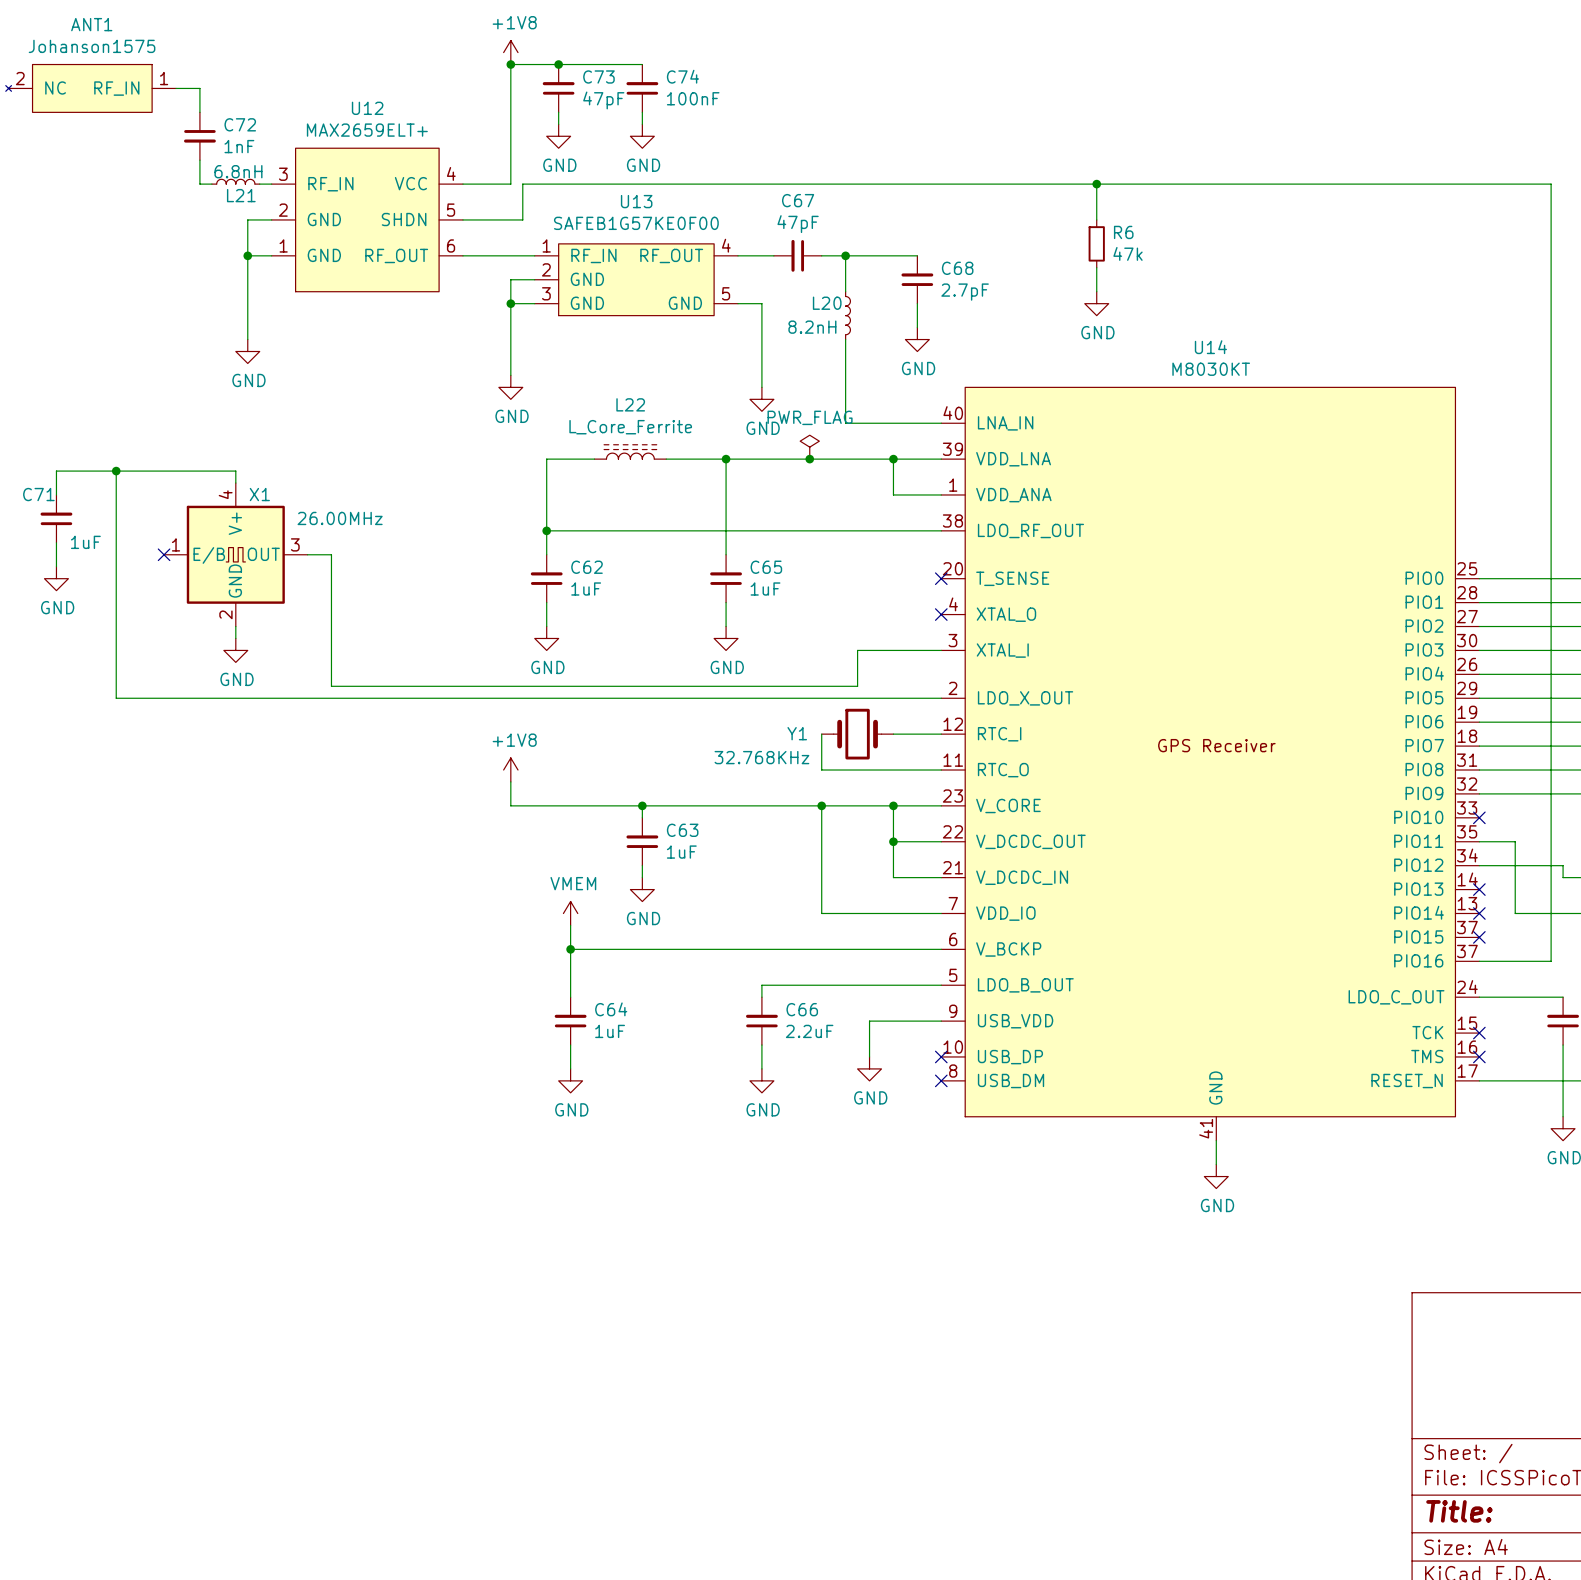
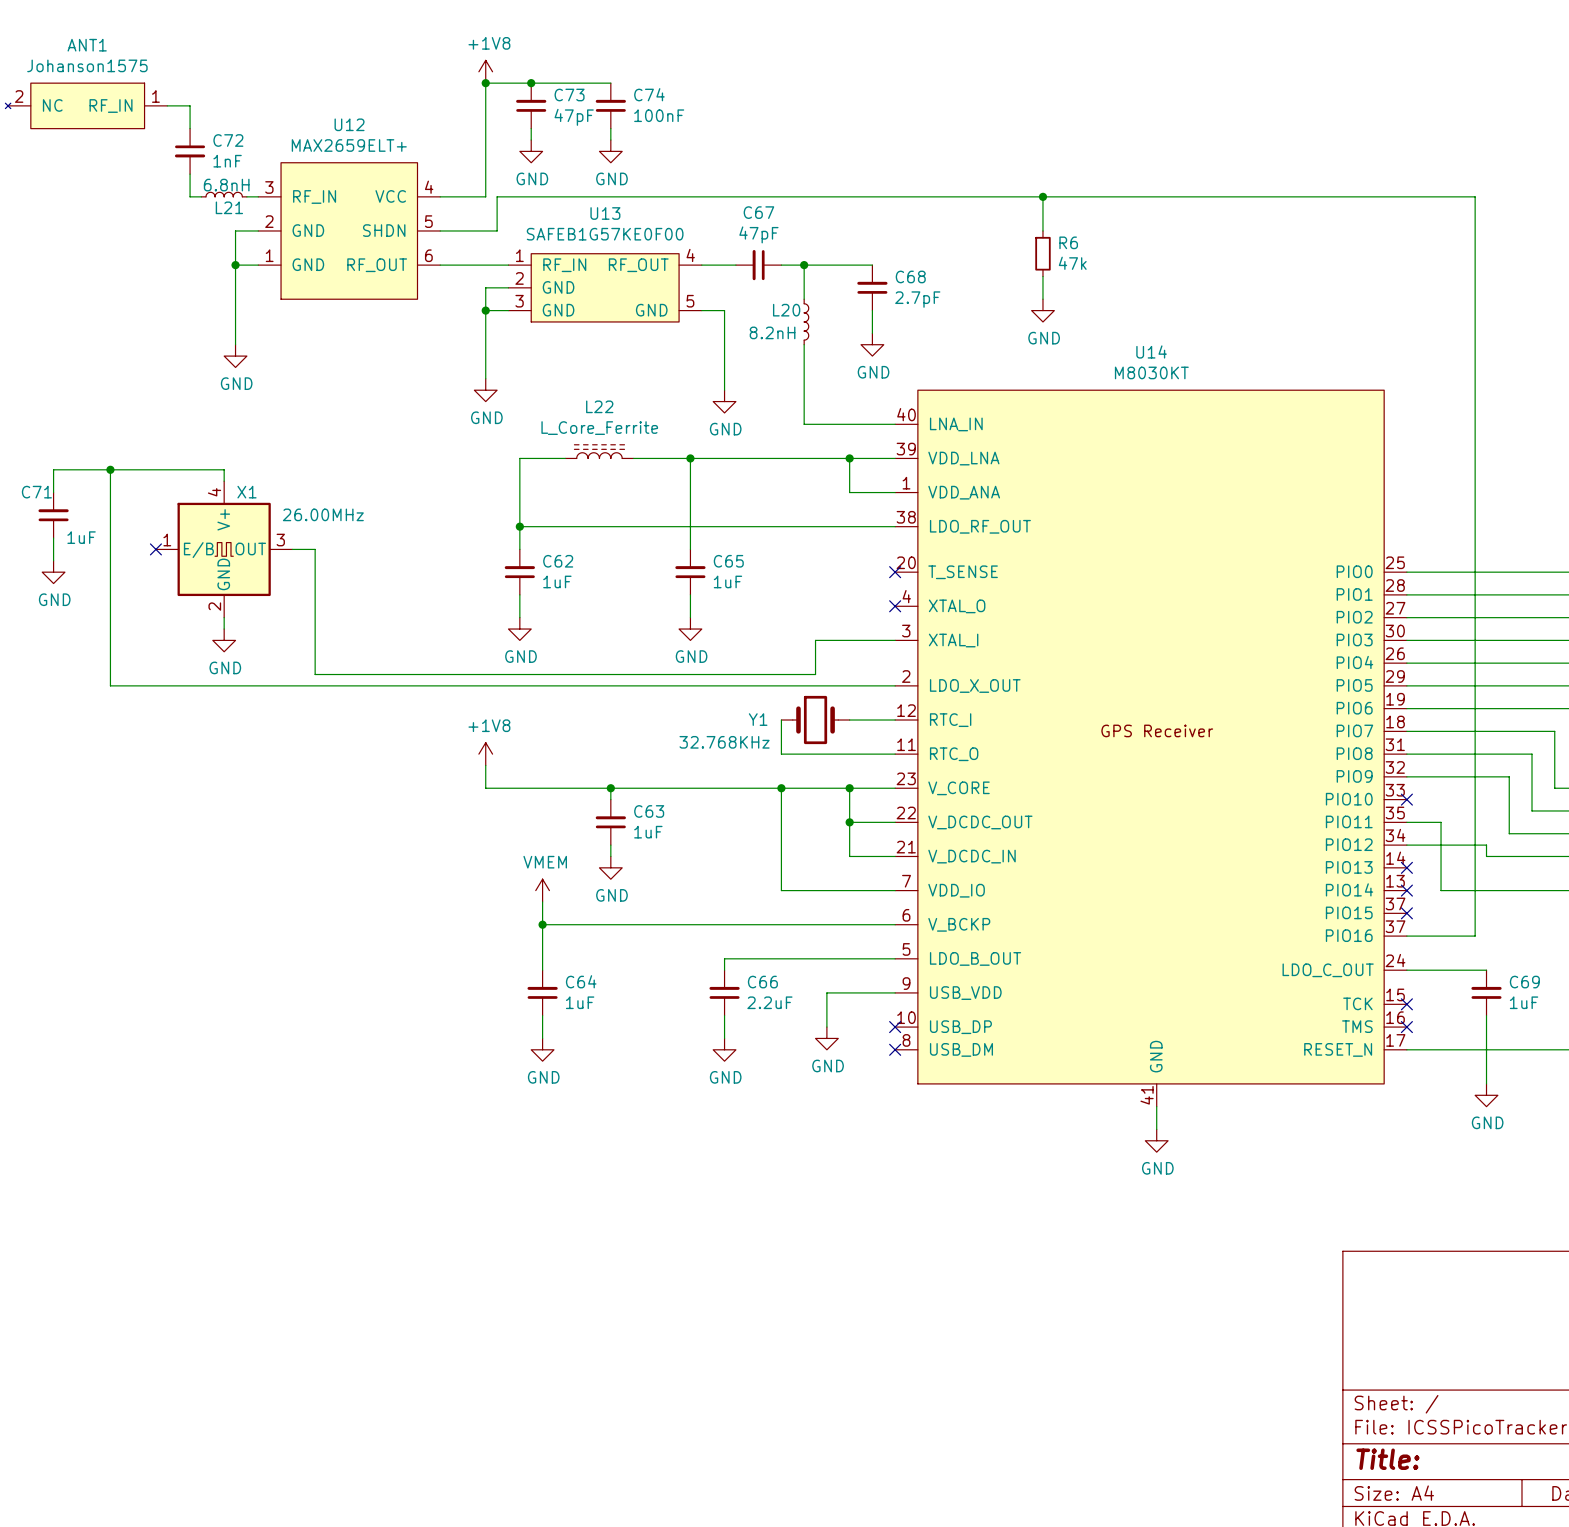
power symbol: PWR_FLAG (809, 447) -> none
junction: (809, 459) -> none

